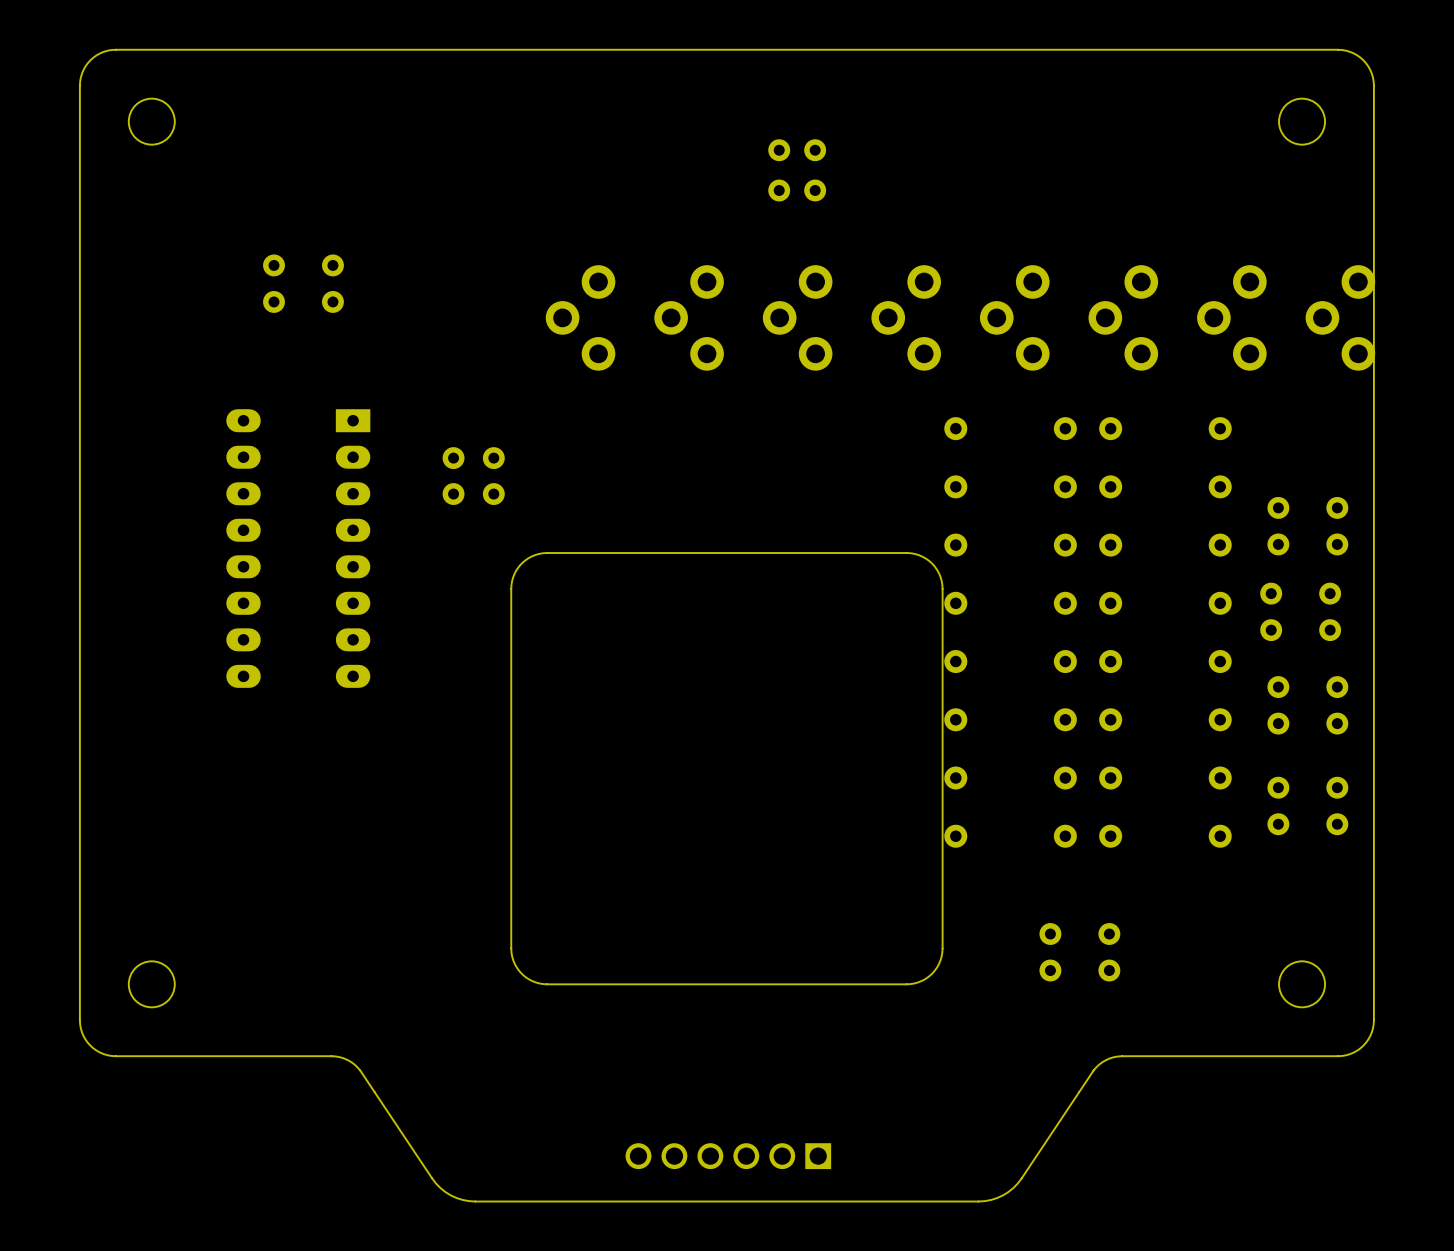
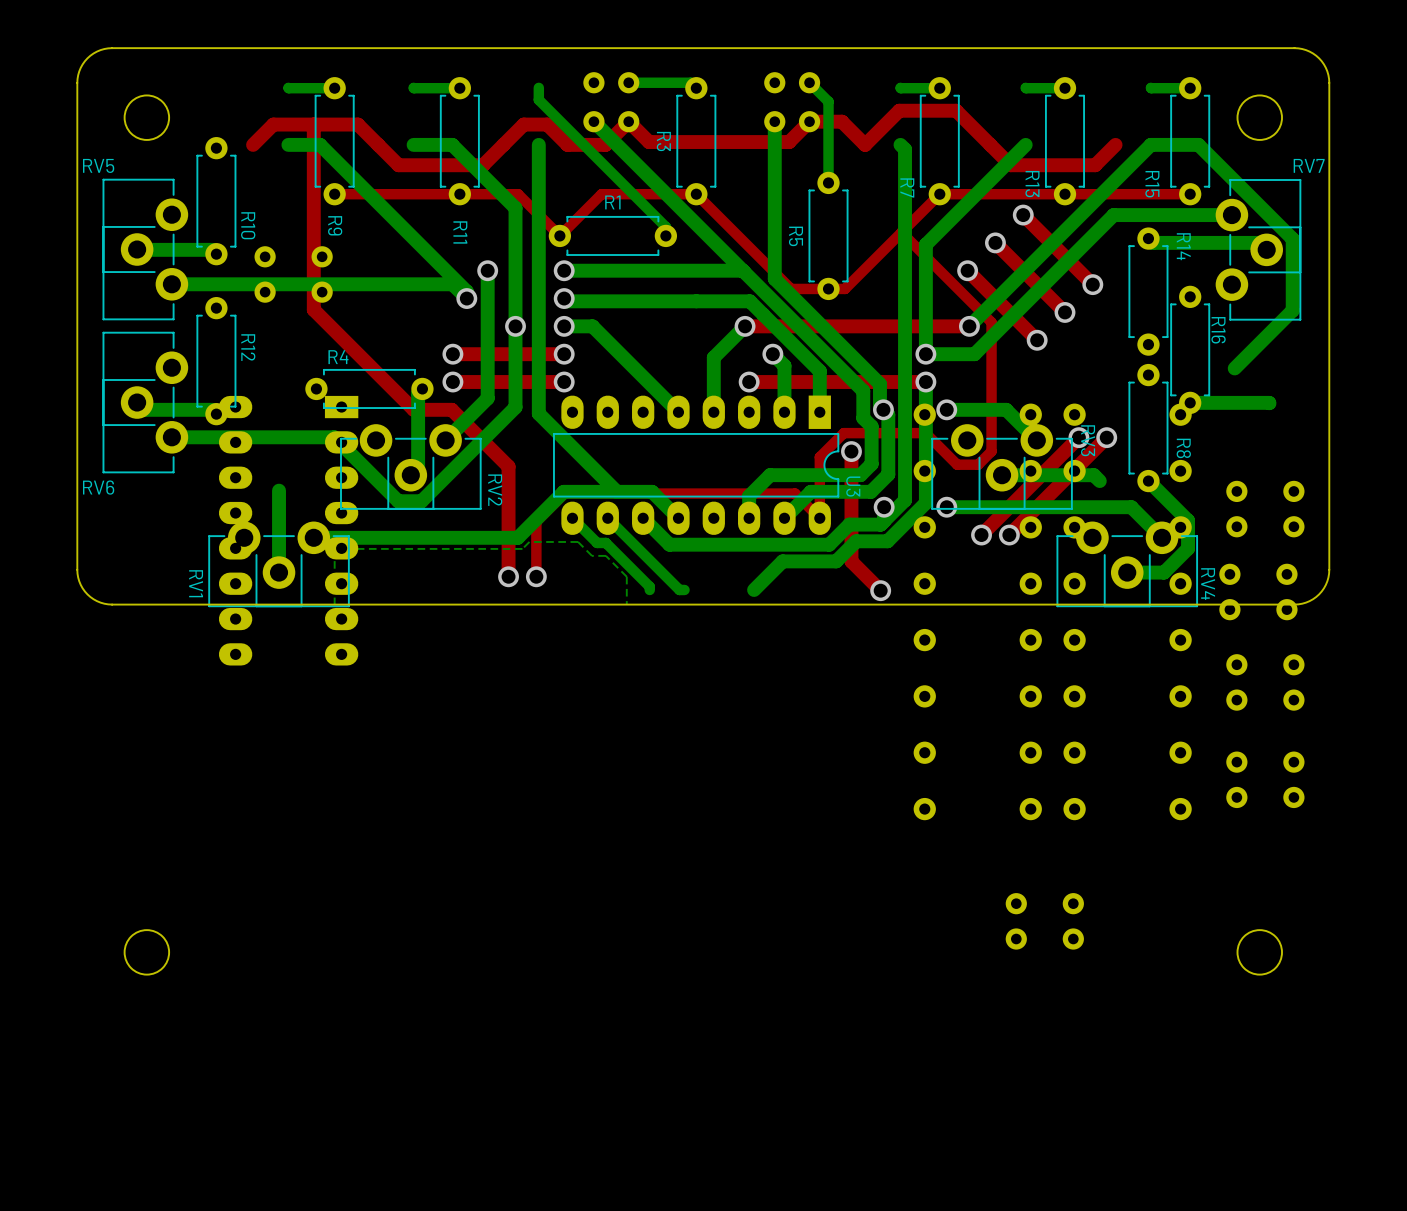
bottom track: none -> (628, 82) (690, 82) (696, 88)
bottom track: none -> (809, 82) (828, 101) (828, 182)
bottom track: none -> (288, 87) (334, 88)
bottom track: none -> (413, 87) (459, 88)
bottom track: none -> (538, 87) (538, 99) (665, 226) (665, 235)
bottom track: none -> (900, 87) (939, 88)
bottom track: none -> (1025, 87) (1064, 88)
bottom track: none -> (1150, 87) (1190, 88)
part: none -> (611, 102)
bottom track: none -> (593, 121) (863, 391) (863, 418) (871, 426) (871, 464) (860, 475) (770, 475) (749, 496) (749, 518)
bottom track: none -> (774, 121) (774, 278) (879, 384) (879, 406) (888, 414) (888, 474) (871, 491) (810, 491) (784, 518)
top track: none -> (313, 124) (313, 309) (413, 409) (451, 409) (508, 466) (508, 576)
R9: none -> (334, 141)
R11: none -> (459, 141)
R3: none -> (696, 141)
R7: none -> (939, 141)
R13: none -> (1064, 141)
R15: none -> (1190, 141)
bottom track: none -> (288, 144) (320, 144) (466, 291) (466, 298) (452, 284) (171, 284)
bottom track: none -> (413, 144) (452, 144) (515, 208) (515, 407) (421, 501) (398, 501) (334, 437) (171, 437)
bottom track: none -> (538, 144) (538, 413) (616, 491)
bottom track: none -> (900, 144) (905, 149) (905, 500) (880, 524) (849, 524) (829, 544) (669, 544) (643, 518)
bottom track: none -> (1025, 144) (925, 244) (925, 354) (974, 354) (1113, 215) (1231, 215)
top track: none -> (1115, 144) (1095, 165) (1010, 165) (956, 110) (899, 110) (865, 144) (841, 121) (809, 121) (789, 142) (649, 142) (628, 121) (605, 144) (567, 144) (547, 124) (523, 124) (483, 165) (398, 165) (357, 124) (273, 124) (253, 144)
part position: (797, 170) -> (792, 102)
top track: none -> (1190, 194) (939, 194) (845, 288) (791, 288) (696, 194) (601, 194) (559, 235) (518, 194) (334, 194)
R10: none -> (216, 201)
top track: none -> (1023, 215) (1092, 284)
via: none -> (1023, 215)
top track: none -> (901, 232) (991, 322) (991, 451) (978, 464) (957, 464) (925, 433) (843, 433) (819, 457) (819, 518) (795, 493) (564, 493) (536, 521) (536, 576)
R1: none -> (612, 235)
R5: none -> (828, 235)
bottom track: none -> (1148, 238) (1152, 242) (1259, 242) (1266, 249)
top track: none -> (995, 242) (1064, 312)
via: none -> (995, 242)
bottom track: none -> (137, 249) (212, 249) (216, 254)
RV5: none -> (145, 249)
RV7: none -> (1258, 249)
bottom track: none -> (487, 270) (487, 398) (445, 440)
via: none -> (487, 270)
via: none -> (564, 270)
bottom track: none -> (742, 270) (564, 270)
top track: none -> (967, 270) (1037, 340)
via: none -> (967, 270)
via: none -> (1092, 284)
R14: none -> (1148, 291)
via: none -> (466, 298)
bottom track: none -> (564, 298) (566, 301) (749, 301) (819, 371) (819, 412)
via: none -> (564, 298)
part: (580, 317) -> none
part: (689, 317) -> none
part: (797, 317) -> none
part: (906, 317) -> none
RV4 side: top (1014, 317) -> bottom (1127, 564)
RV3 side: top (1123, 317) -> bottom (1002, 466)
part: (1231, 317) -> none
part: (1340, 317) -> none
via: none -> (1064, 312)
via: none -> (515, 326)
bottom track: none -> (564, 326) (592, 326) (678, 412)
via: none -> (564, 326)
bottom track: none -> (745, 326) (713, 357) (713, 412)
via: none -> (745, 326)
top track: none -> (969, 326) (745, 326)
bottom track: none -> (969, 326) (1150, 144) (1198, 144) (1292, 239) (1292, 310) (1234, 368)
via: none -> (969, 326)
via: none -> (1037, 340)
R16: none -> (1190, 349)
via: none -> (452, 354)
top track: none -> (564, 354) (452, 354)
via: none -> (564, 354)
bottom track: none -> (772, 354) (784, 365) (784, 412)
via: none -> (772, 354)
via: none -> (925, 354)
R12: none -> (216, 361)
via: none -> (452, 382)
top track: none -> (564, 382) (452, 382)
via: none -> (564, 382)
via: none -> (749, 382)
top track: none -> (925, 382) (749, 382)
bottom track: none -> (925, 382) (925, 502) (887, 541) (856, 541) (836, 561) (782, 561) (754, 589)
via: none -> (925, 382)
R4: none -> (369, 388)
bottom track: none -> (422, 388) (418, 393) (418, 467) (410, 475)
bottom track: none -> (137, 402) (144, 409) (212, 409) (216, 414)
RV6: none -> (145, 402)
bottom track: none -> (1190, 402) (1269, 403)
via: none -> (883, 409)
bottom track: none -> (946, 409) (1006, 409) (1036, 440)
via: none -> (946, 409)
R8: none -> (1148, 428)
top track: none -> (1078, 437) (981, 535)
via: none -> (1078, 437)
top track: none -> (1106, 437) (1009, 535)
via: none -> (1106, 437)
top track: none -> (851, 451) (851, 561) (880, 590)
via: none -> (851, 451)
part: (473, 476) -> none
U3: none -> (696, 465)
RV2: none -> (410, 466)
bottom track: none -> (1002, 475) (1093, 475) (1099, 481)
bottom track: none -> (1148, 481) (1188, 520) (1188, 548) (1164, 572) (1127, 572)
bottom track: none -> (279, 490) (279, 572)
via: none -> (884, 507)
bottom track: none -> (946, 507) (1131, 507) (1162, 537)
via: none -> (946, 507)
bottom track: none -> (572, 518) (597, 542) (605, 542) (649, 586) (649, 589)
bottom track: none -> (607, 518) (679, 589) (684, 589)
bottom track: none -> (678, 518) (652, 491) (563, 491) (517, 537) (313, 537)
board edge: (906, 552) (547, 552) (535, 555) (521, 563) (514, 573) (511, 588) (511, 948) (513, 960) (521, 973) (531, 980) (547, 984) (906, 984) (922, 980) (932, 973) (939, 963) (942, 948) (942, 584) (939, 573) (932, 563) (922, 556) (906, 552) -> none
via: none -> (981, 535)
via: none -> (1009, 535)
RV1: none -> (279, 564)
board edge: (1373, 588) (1373, 1020) (1368, 1039) (1357, 1050) (1342, 1055) (1122, 1056) (1110, 1058) (1093, 1070) (1017, 1183) (1002, 1195) (991, 1199) (978, 1201) (468, 1201) (450, 1195) (436, 1183) (360, 1070) (343, 1058) (331, 1056) (115, 1056) (96, 1050) (83, 1035) (79, 1020) (79, 588) -> (1329, 569) (1325, 584) (1319, 594) (1306, 602) (1294, 604) (112, 604) (100, 602) (87, 594) (79, 581) (77, 569)
via: none -> (508, 576)
via: none -> (536, 576)
via: none -> (880, 590)
bottom zone outline: none -> (626, 604) (626, 576) (605, 555) (592, 555) (578, 541) (529, 541) (522, 548) (334, 548) (334, 604)
part: (728, 1156) -> none

